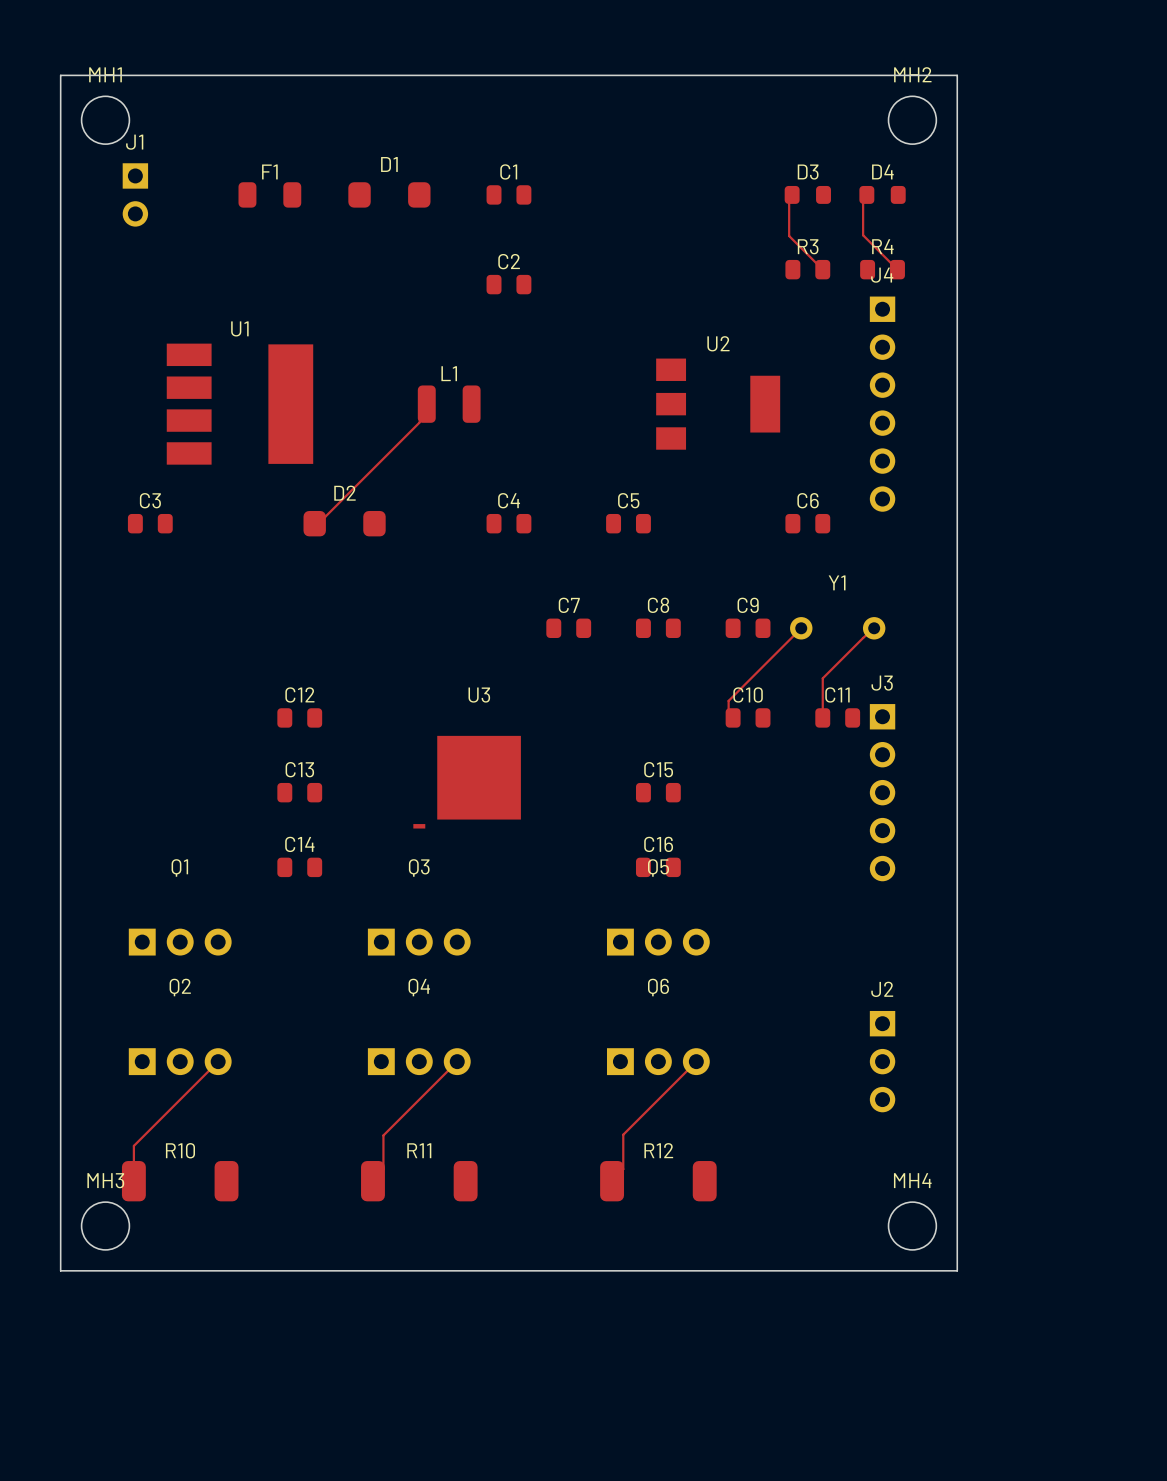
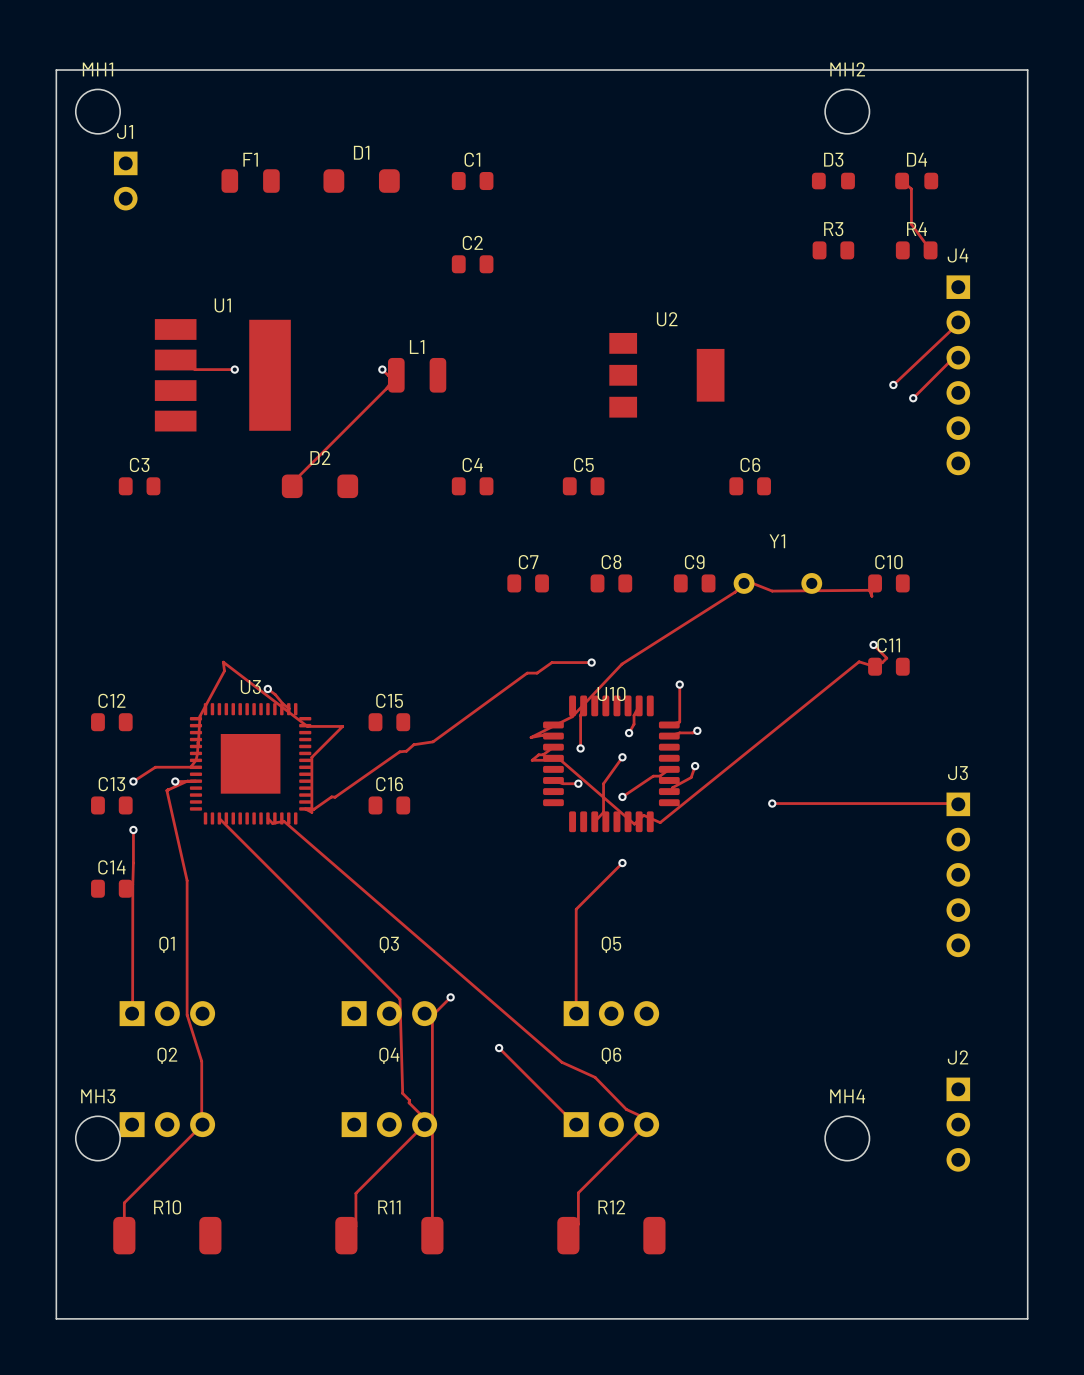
board edge: (957, 75) (957, 1270) (60, 1270) -> (888, 70) (1027, 70) (1027, 1318) (56, 1318) (56, 1180)
track: (792, 194) (789, 203) (789, 236) (822, 269) -> none
D3 position: (807, 194) -> (833, 181)
track: (866, 194) (863, 203) (863, 235) (897, 269) -> none
D4 position: (882, 194) -> (916, 181)
track: none -> (902, 181) (911, 188) (911, 224) (930, 250)
R3 position: (807, 269) -> (833, 250)
R4 position: (882, 269) -> (916, 250)
track: none -> (958, 322) (893, 385)
track: none -> (958, 357) (948, 362) (913, 398)
track: none -> (175, 360) (195, 369) (234, 369)
via: none -> (234, 369)
via: none -> (382, 369)
track: (426, 404) (419, 422) (325, 516) (314, 523) -> (382, 369) (388, 376) (396, 375) (386, 388) (298, 477) (292, 486)
J4 position: (882, 404) -> (958, 375)
via: none -> (893, 385)
via: none -> (913, 398)
track: (801, 628) (728, 700) (728, 709) (733, 717) -> none
track: (874, 628) (822, 678) (822, 717) -> none
track: none -> (875, 583) (871, 596) (869, 590) (772, 591) (752, 583) (744, 583) (735, 592) (621, 664) (572, 716) (531, 737) (553, 736)
track: none -> (873, 644) (886, 658) (882, 662) (875, 666) (859, 661) (660, 822) (643, 815) (634, 824) (560, 760) (532, 760) (553, 747)
via: none -> (873, 644)
track: none -> (591, 662) (551, 662) (537, 673) (527, 673) (433, 741) (413, 744) (406, 751) (399, 751) (335, 797) (331, 796) (314, 809) (305, 808) (311, 812) (311, 757) (342, 726) (307, 726) (223, 662) (224, 670) (199, 716) (195, 760) (190, 767) (155, 767) (133, 781)
via: none -> (591, 662)
C12 position: (299, 717) -> (111, 722)
C10 position: (748, 717) -> (888, 583)
C11 position: (837, 717) -> (888, 666)
U3 footprint: [413, 735, 521, 829] -> [189, 703, 312, 825]
track: none -> (679, 684) (679, 722) (669, 724)
via: none -> (679, 684)
track: none -> (267, 689) (288, 709)
via: none -> (267, 689)
track: none -> (583, 705) (580, 715) (580, 748)
track: none -> (639, 705) (634, 715) (634, 724) (629, 733)
track: none -> (697, 730) (669, 736)
via: none -> (697, 730)
via: none -> (629, 733)
C13 position: (299, 792) -> (111, 805)
C15 position: (658, 792) -> (389, 722)
J3 position: (882, 792) -> (958, 874)
via: none -> (580, 748)
track: none -> (622, 757) (603, 783) (603, 812) (594, 821)
via: none -> (622, 757)
U10: none -> (611, 763)
track: none -> (695, 766) (691, 777) (672, 787) (672, 791) (669, 791)
via: none -> (695, 766)
track: none -> (669, 769) (659, 776) (653, 776) (622, 796)
track: none -> (553, 780) (562, 783) (578, 783)
via: none -> (133, 781)
track: none -> (175, 781) (190, 781) (195, 781) (187, 781) (167, 790) (168, 789) (166, 790) (187, 880) (187, 1015) (201, 1061) (202, 1124) (124, 1202) (124, 1235)
via: none -> (175, 781)
via: none -> (578, 783)
via: none -> (622, 796)
track: none -> (772, 803) (958, 804)
via: none -> (772, 803)
C14 position: (299, 867) -> (111, 888)
C16 position: (658, 867) -> (389, 805)
track: none -> (219, 818) (399, 999) (402, 1093) (420, 1113) (424, 1124) (355, 1193) (355, 1226) (346, 1235)
track: none -> (267, 818) (272, 823) (283, 821) (561, 1062) (595, 1077) (626, 1109) (641, 1116) (646, 1124) (578, 1192) (578, 1224) (568, 1235)
track: none -> (133, 829) (132, 1013)
via: none -> (133, 829)
track: none -> (622, 863) (576, 909) (576, 1013)
via: none -> (622, 863)
Q1 position: (180, 942) -> (167, 1013)
Q3 position: (419, 942) -> (389, 1013)
Q5 position: (658, 942) -> (611, 1013)
Q2 position: (180, 1061) -> (167, 1124)
track: (218, 1061) (133, 1145) (133, 1181) -> none
Q4 position: (419, 1061) -> (389, 1124)
track: (457, 1061) (383, 1135) (383, 1169) (372, 1181) -> none
Q6 position: (658, 1061) -> (611, 1124)
track: (696, 1061) (623, 1134) (623, 1169) (612, 1181) -> none
J2 position: (882, 1061) -> (958, 1124)
track: none -> (450, 997) (432, 1015) (432, 1235)
via: none -> (450, 997)
track: none -> (499, 1048) (576, 1124)
via: none -> (499, 1048)
R10 position: (180, 1181) -> (167, 1235)
R11 position: (419, 1181) -> (389, 1235)
R12 position: (658, 1181) -> (611, 1235)

